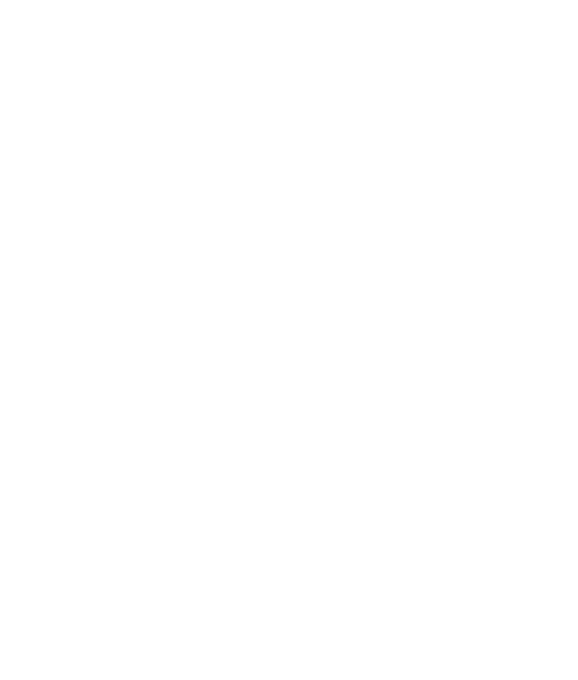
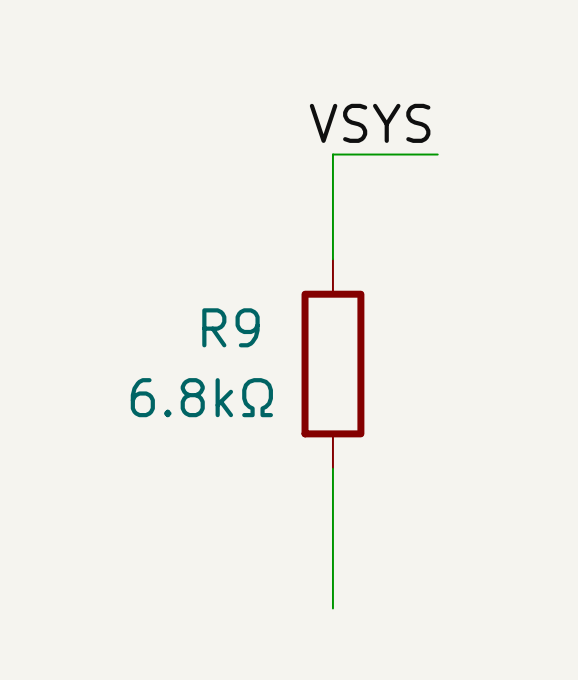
label: none -> VSYS (370, 123)
wire: none -> (437, 154) (332, 154) (332, 259)
R9: none -> 6.8kΩ (332, 364)
wire: none -> (332, 468) (332, 608)

